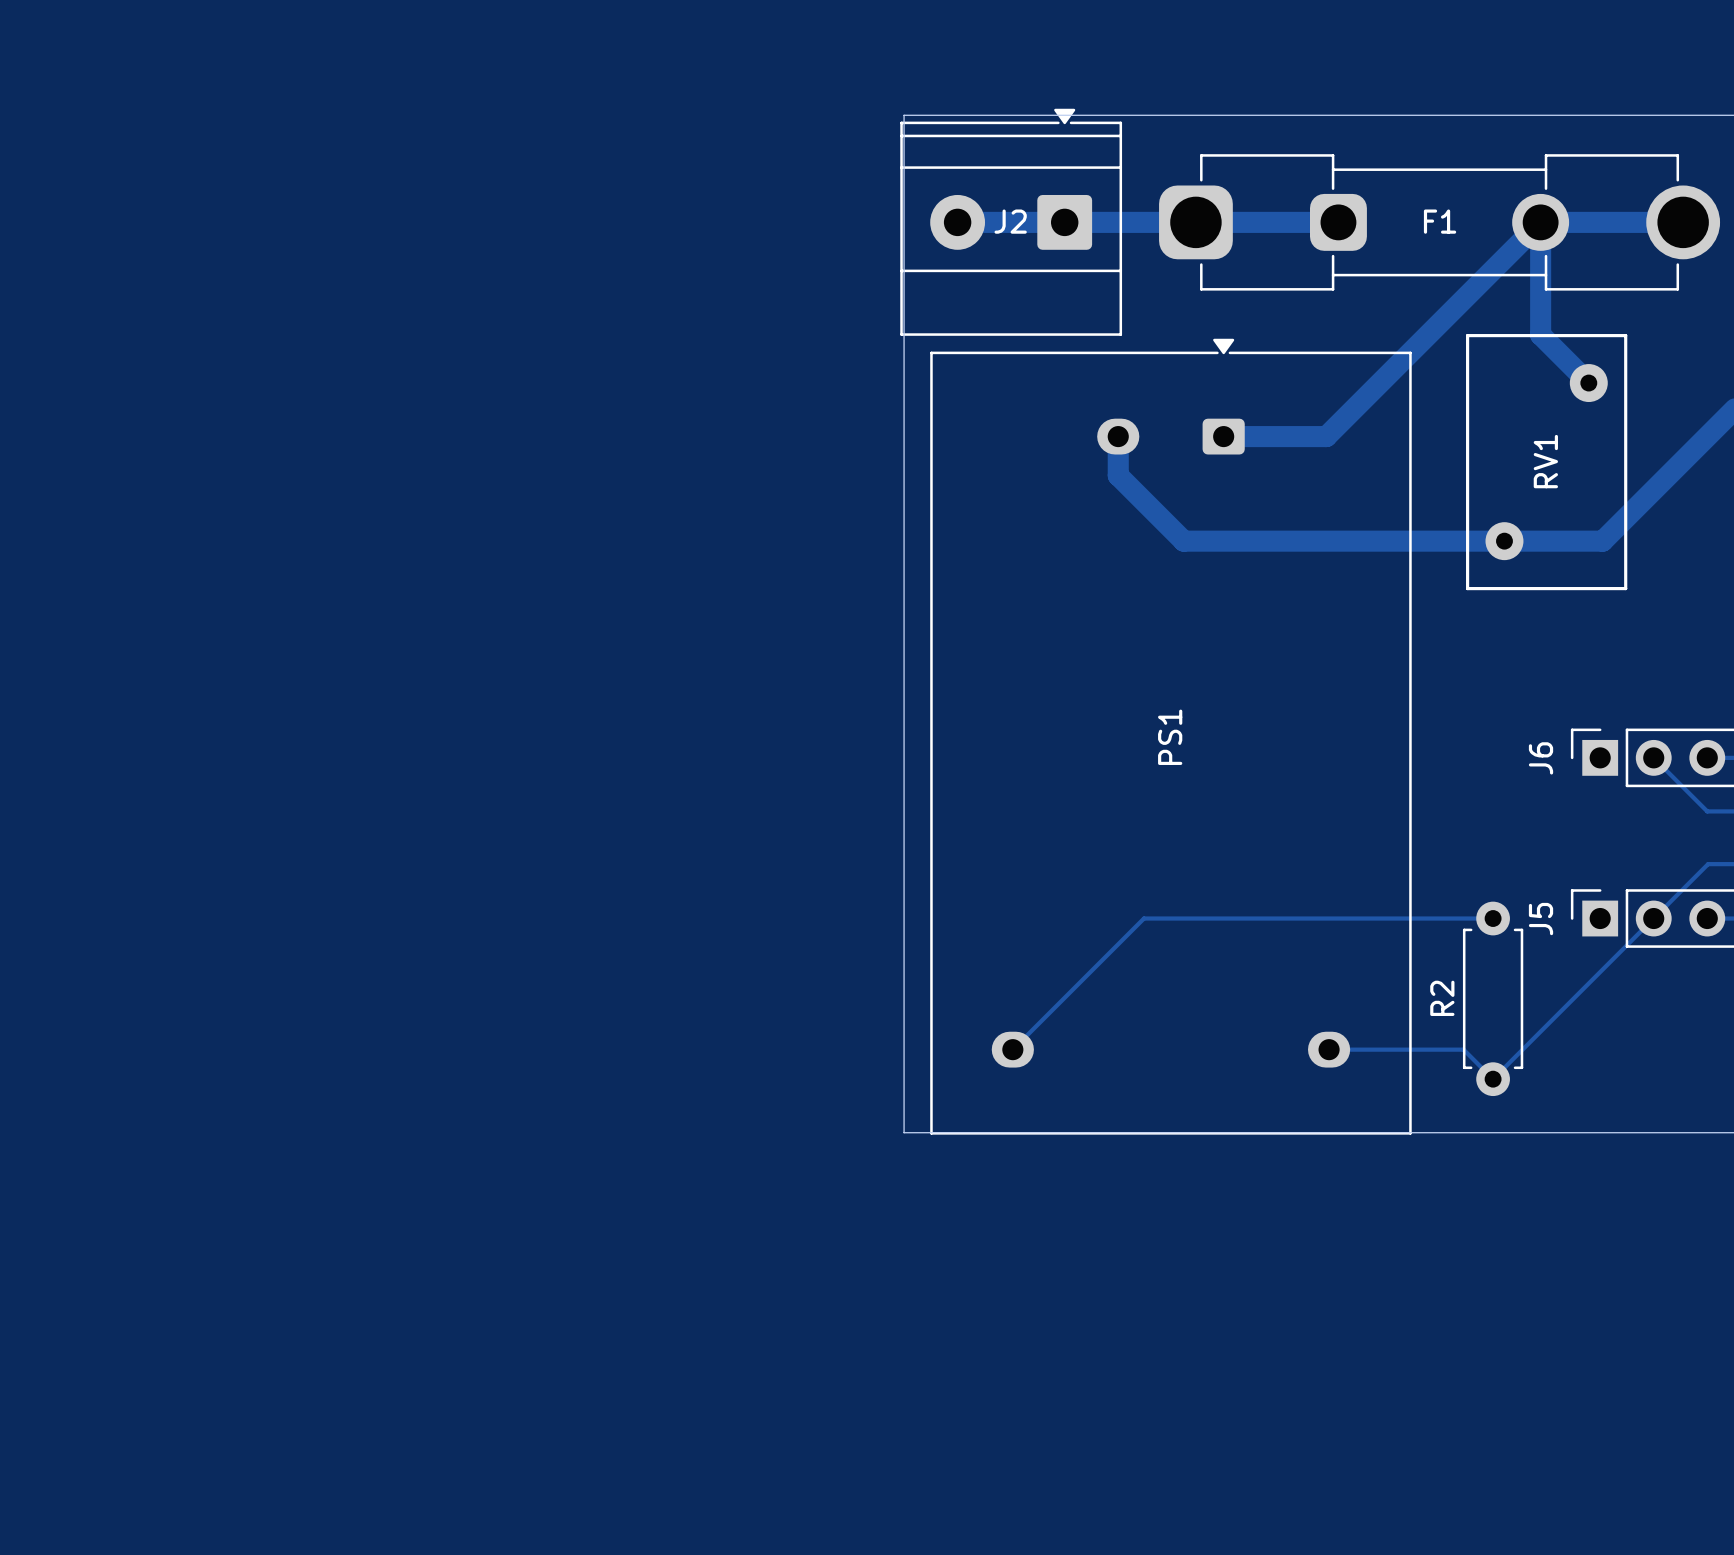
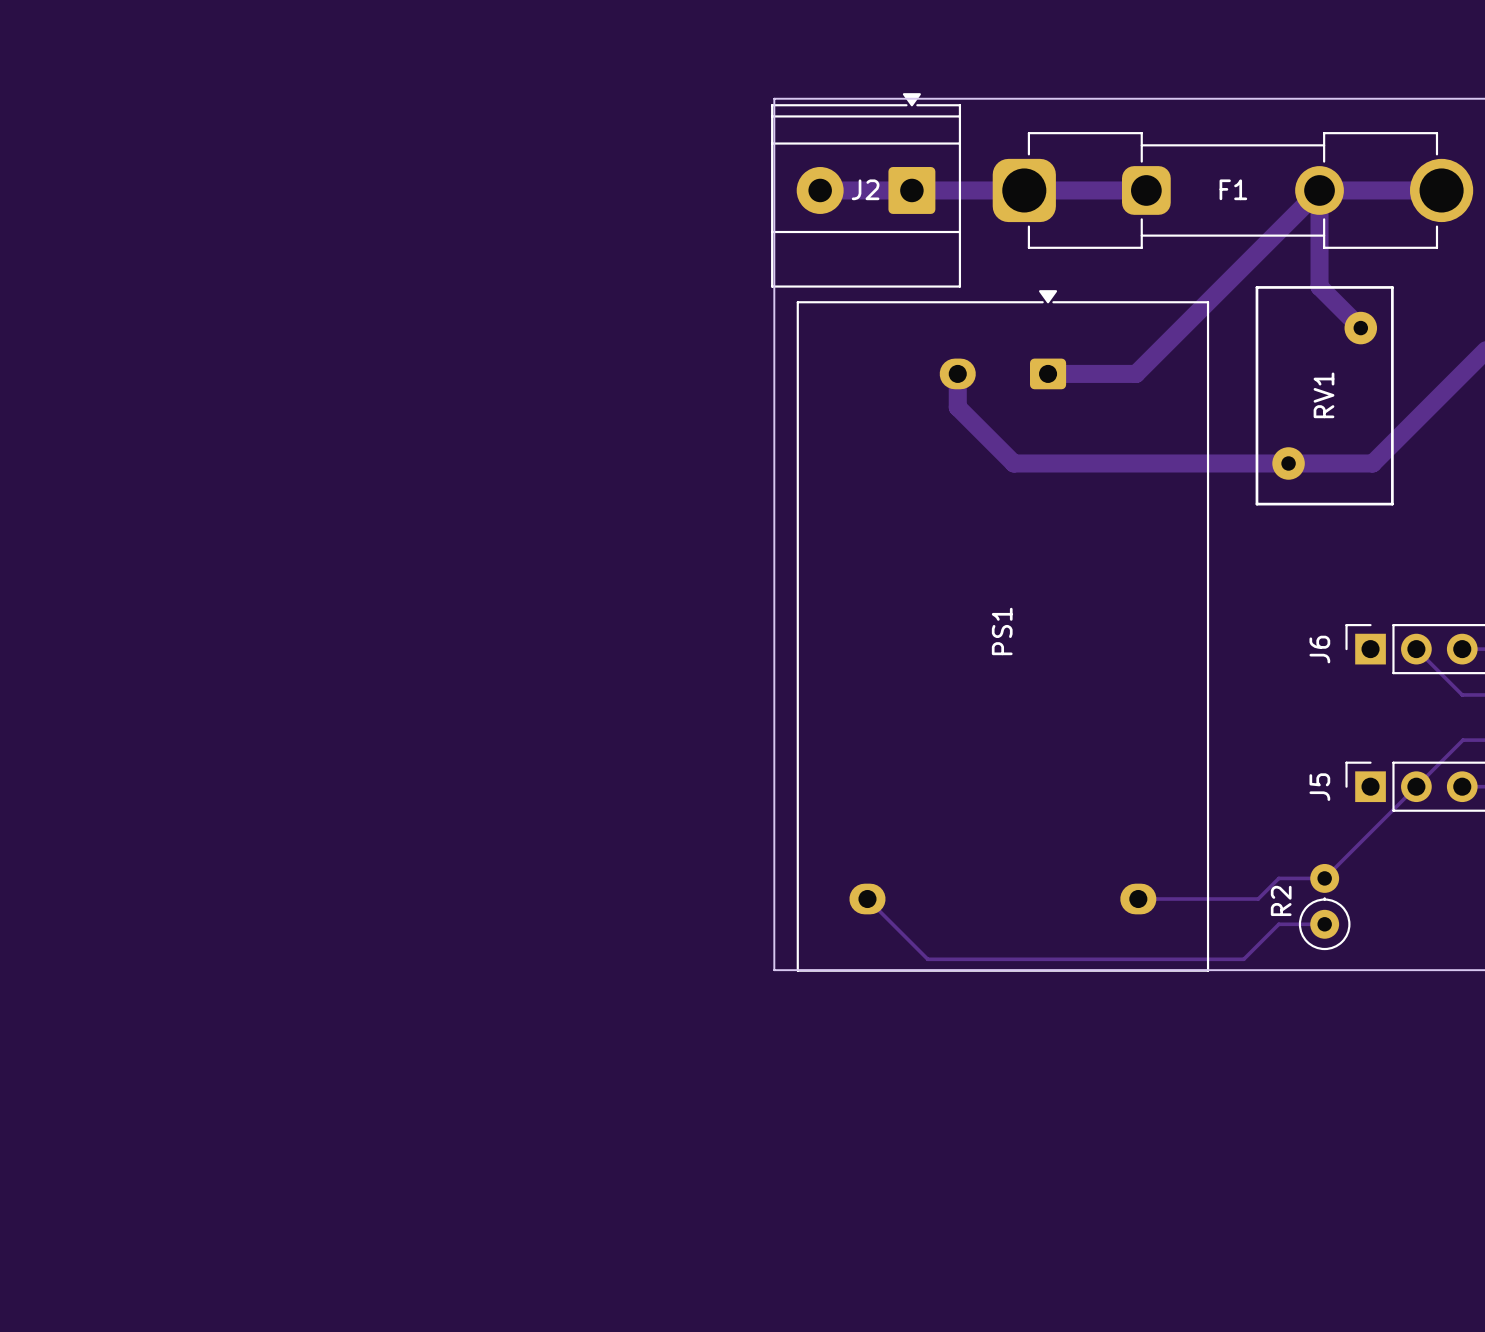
R2 footprint: [1462, 901, 1524, 1097] -> [1298, 863, 1351, 951]
track: (1493, 918) (1143, 918) (1012, 1049) -> (1324, 924) (1278, 924) (1243, 959) (927, 959) (867, 899)
track: (1546, 1025) (1493, 1079) (1463, 1049) -> (1324, 878) (1278, 878) (1258, 899) (1253, 899)

